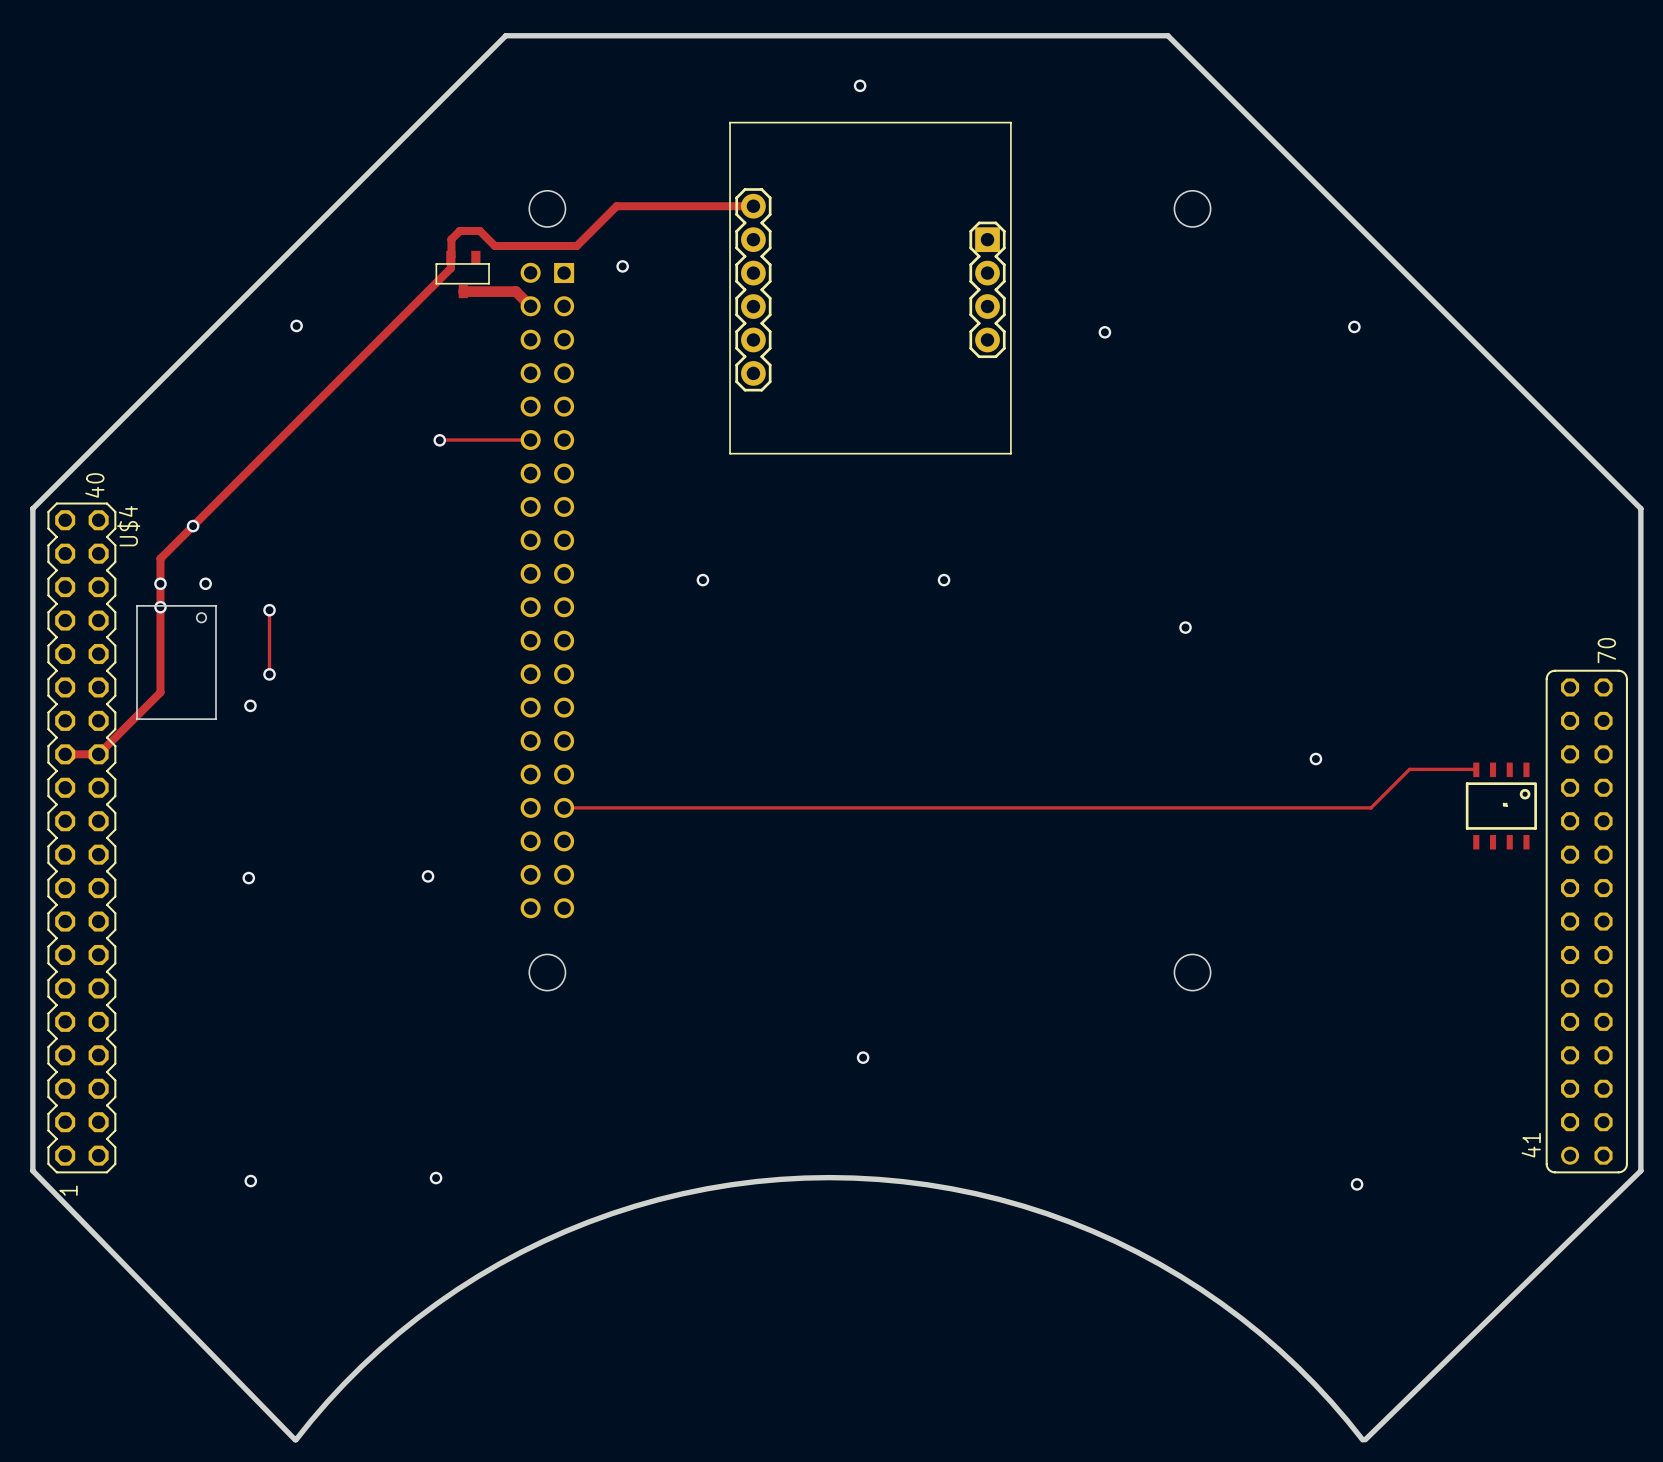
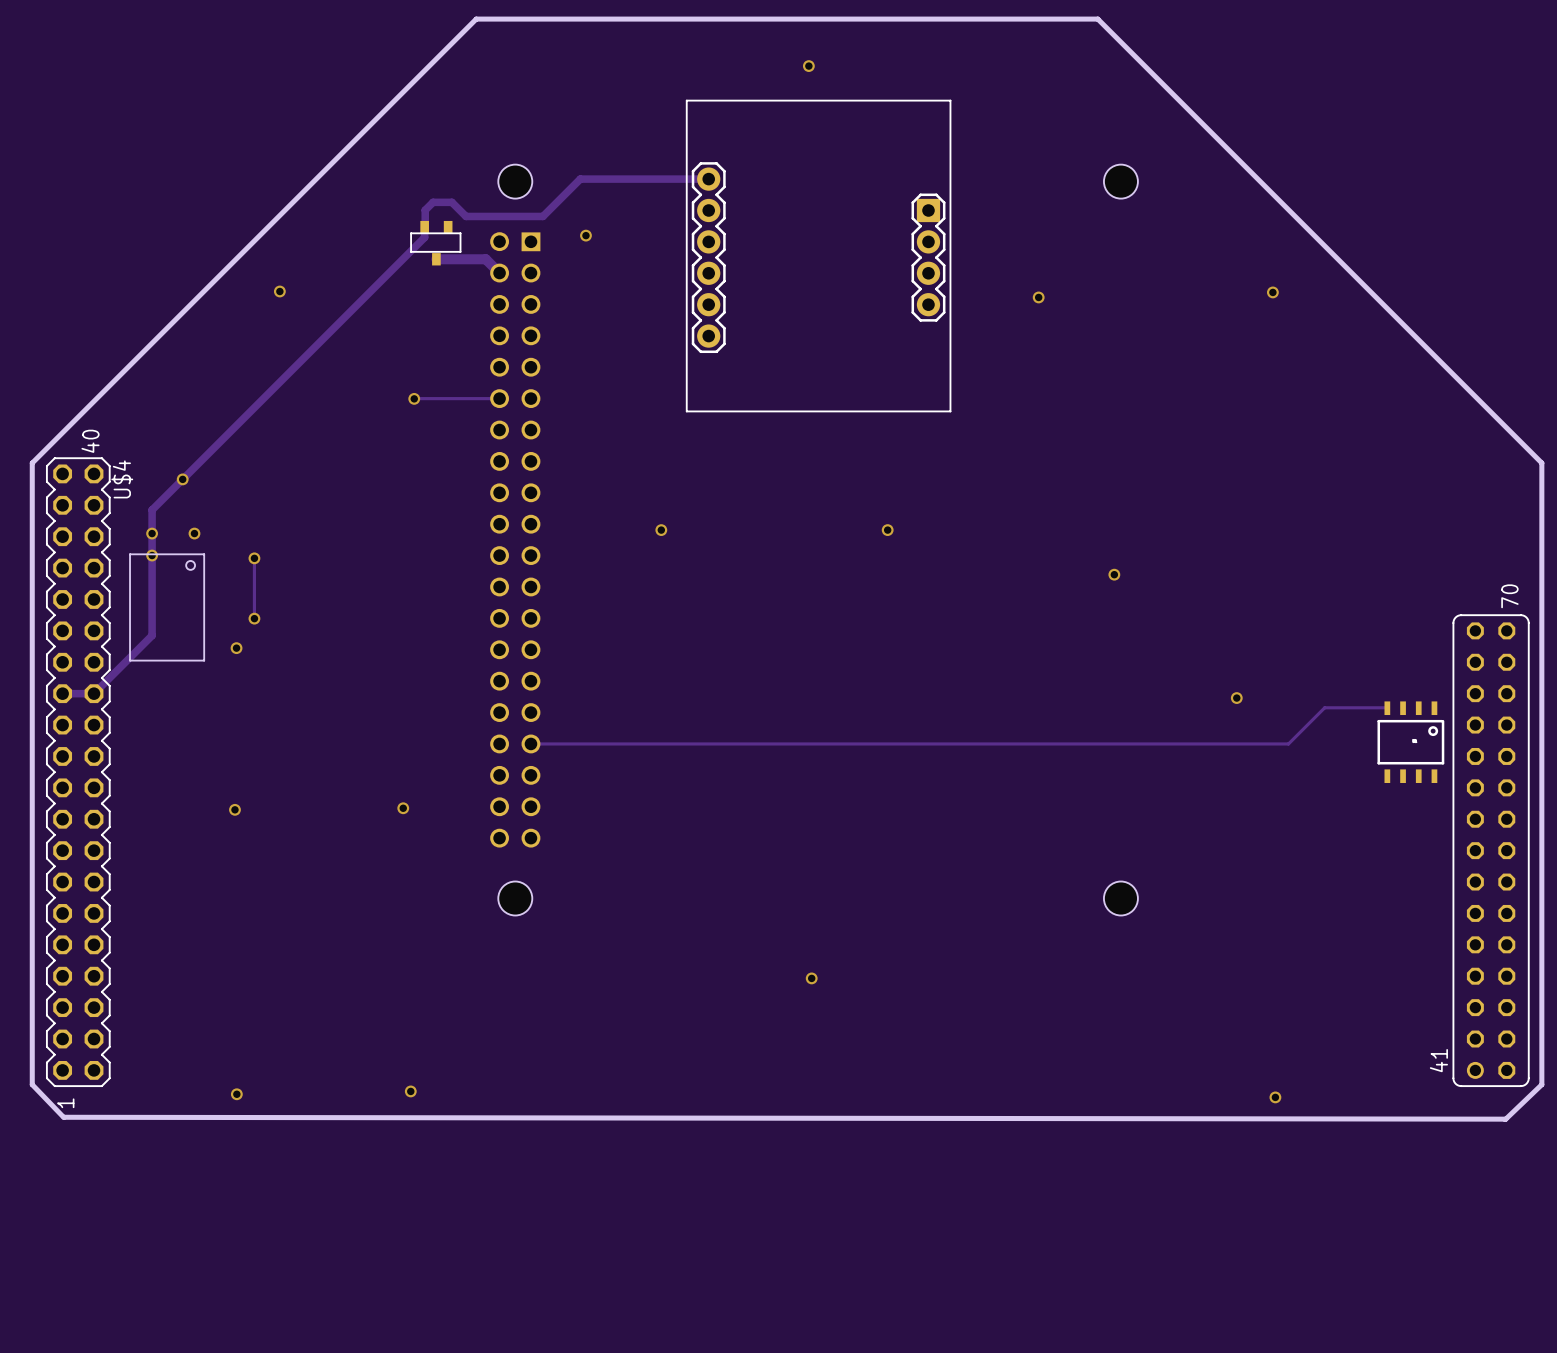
board edge: (32, 1170) (295, 1439) -> (32, 1084) (63, 1117)
board edge: (1640, 1170) (1365, 1439) -> (1541, 1084) (1505, 1119)
board edge: none -> (64, 1117) (1505, 1119)
board edge: (295, 1439) (344, 1383) (398, 1333) (457, 1289) (521, 1252) (565, 1231) (611, 1213) (682, 1193) (755, 1181) (829, 1177) (903, 1181) (975, 1193) (1046, 1213) (1092, 1231) (1137, 1252) (1201, 1289) (1260, 1333) (1314, 1383) (1362, 1439) -> none

